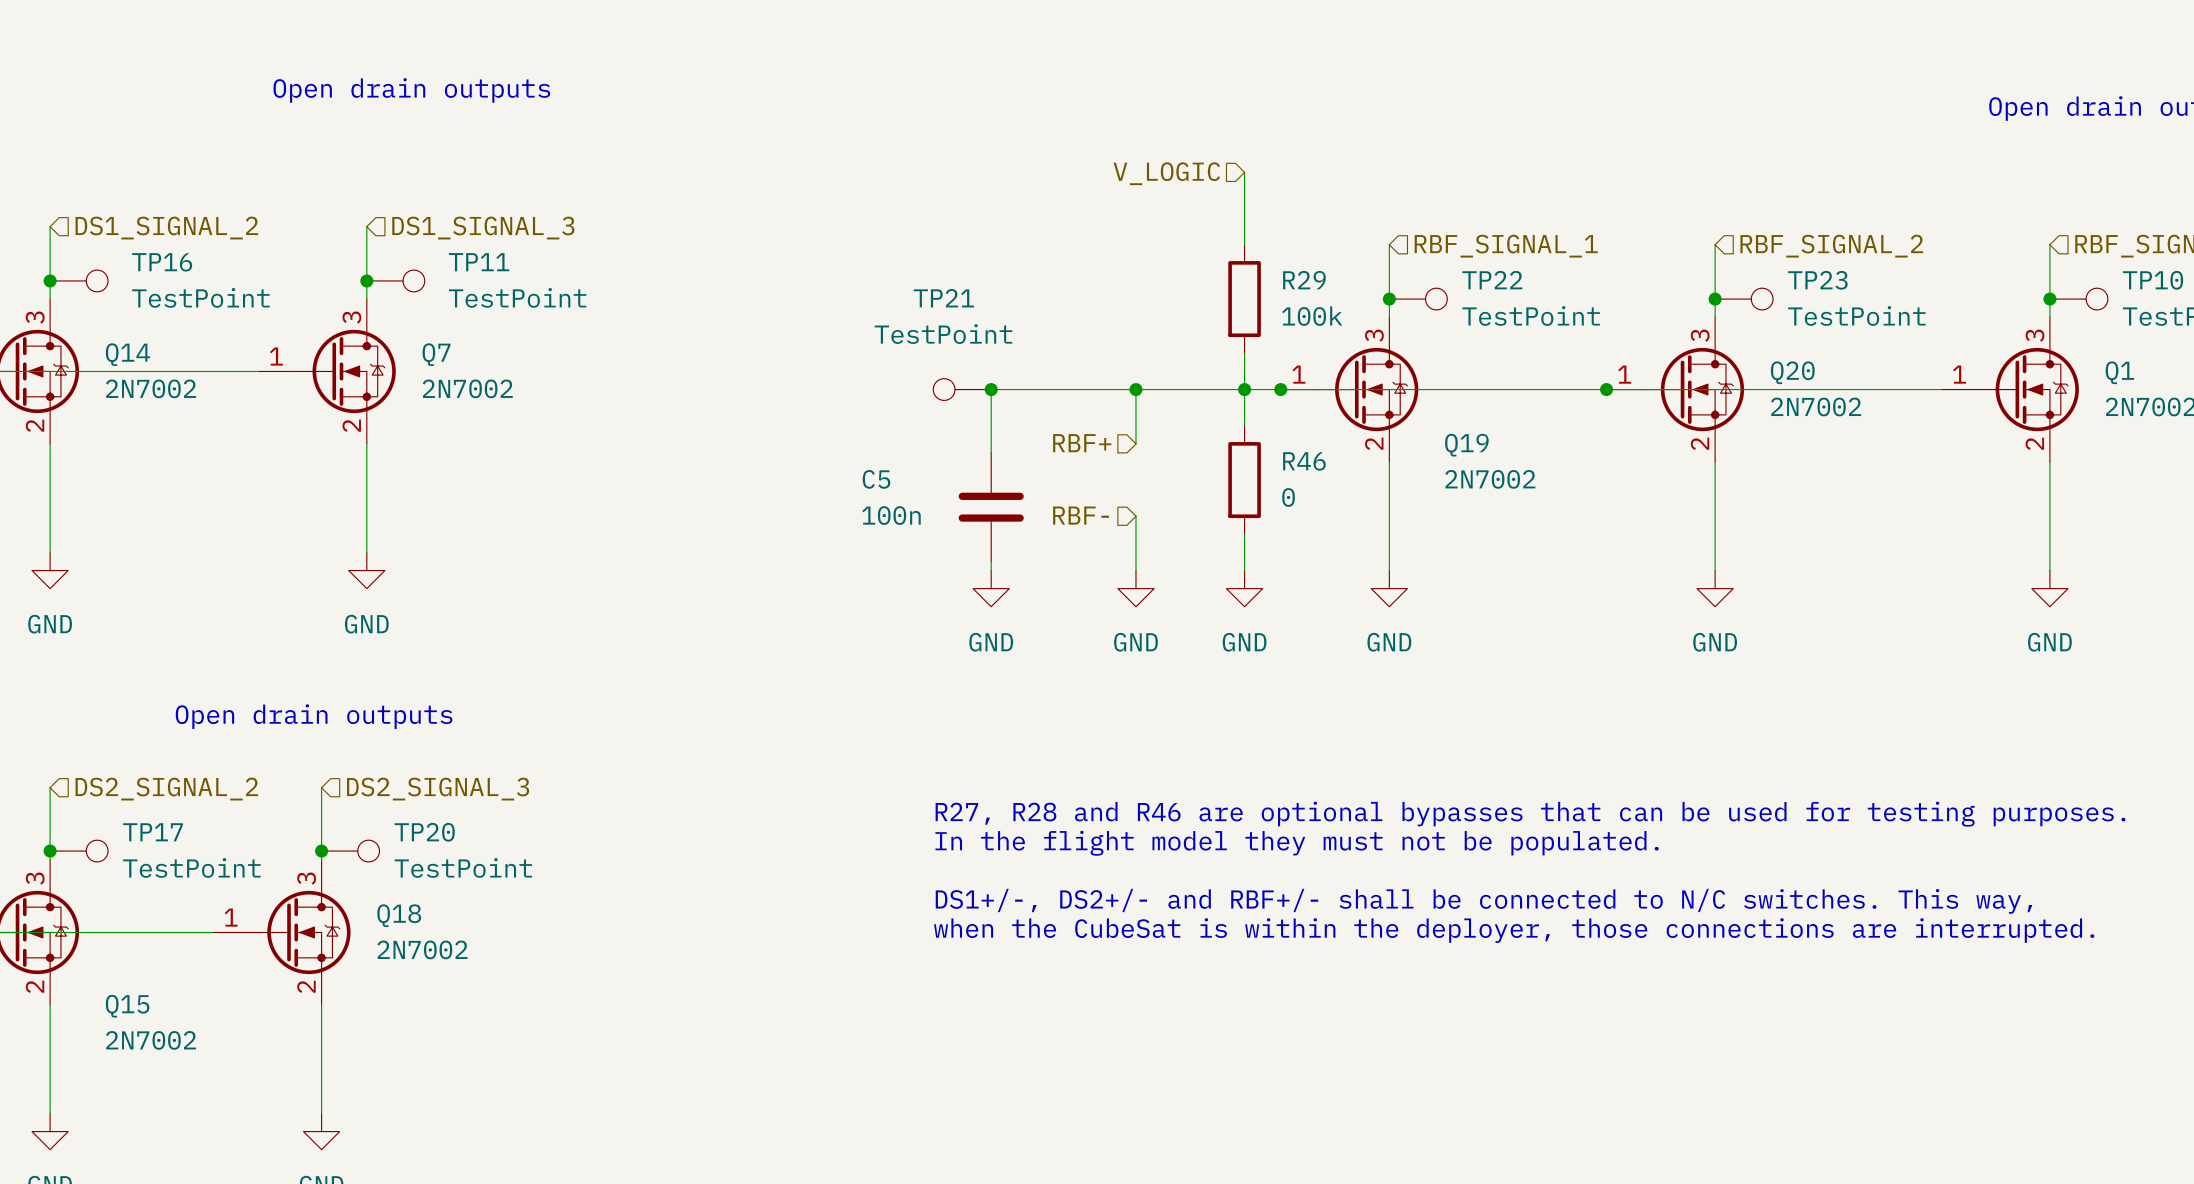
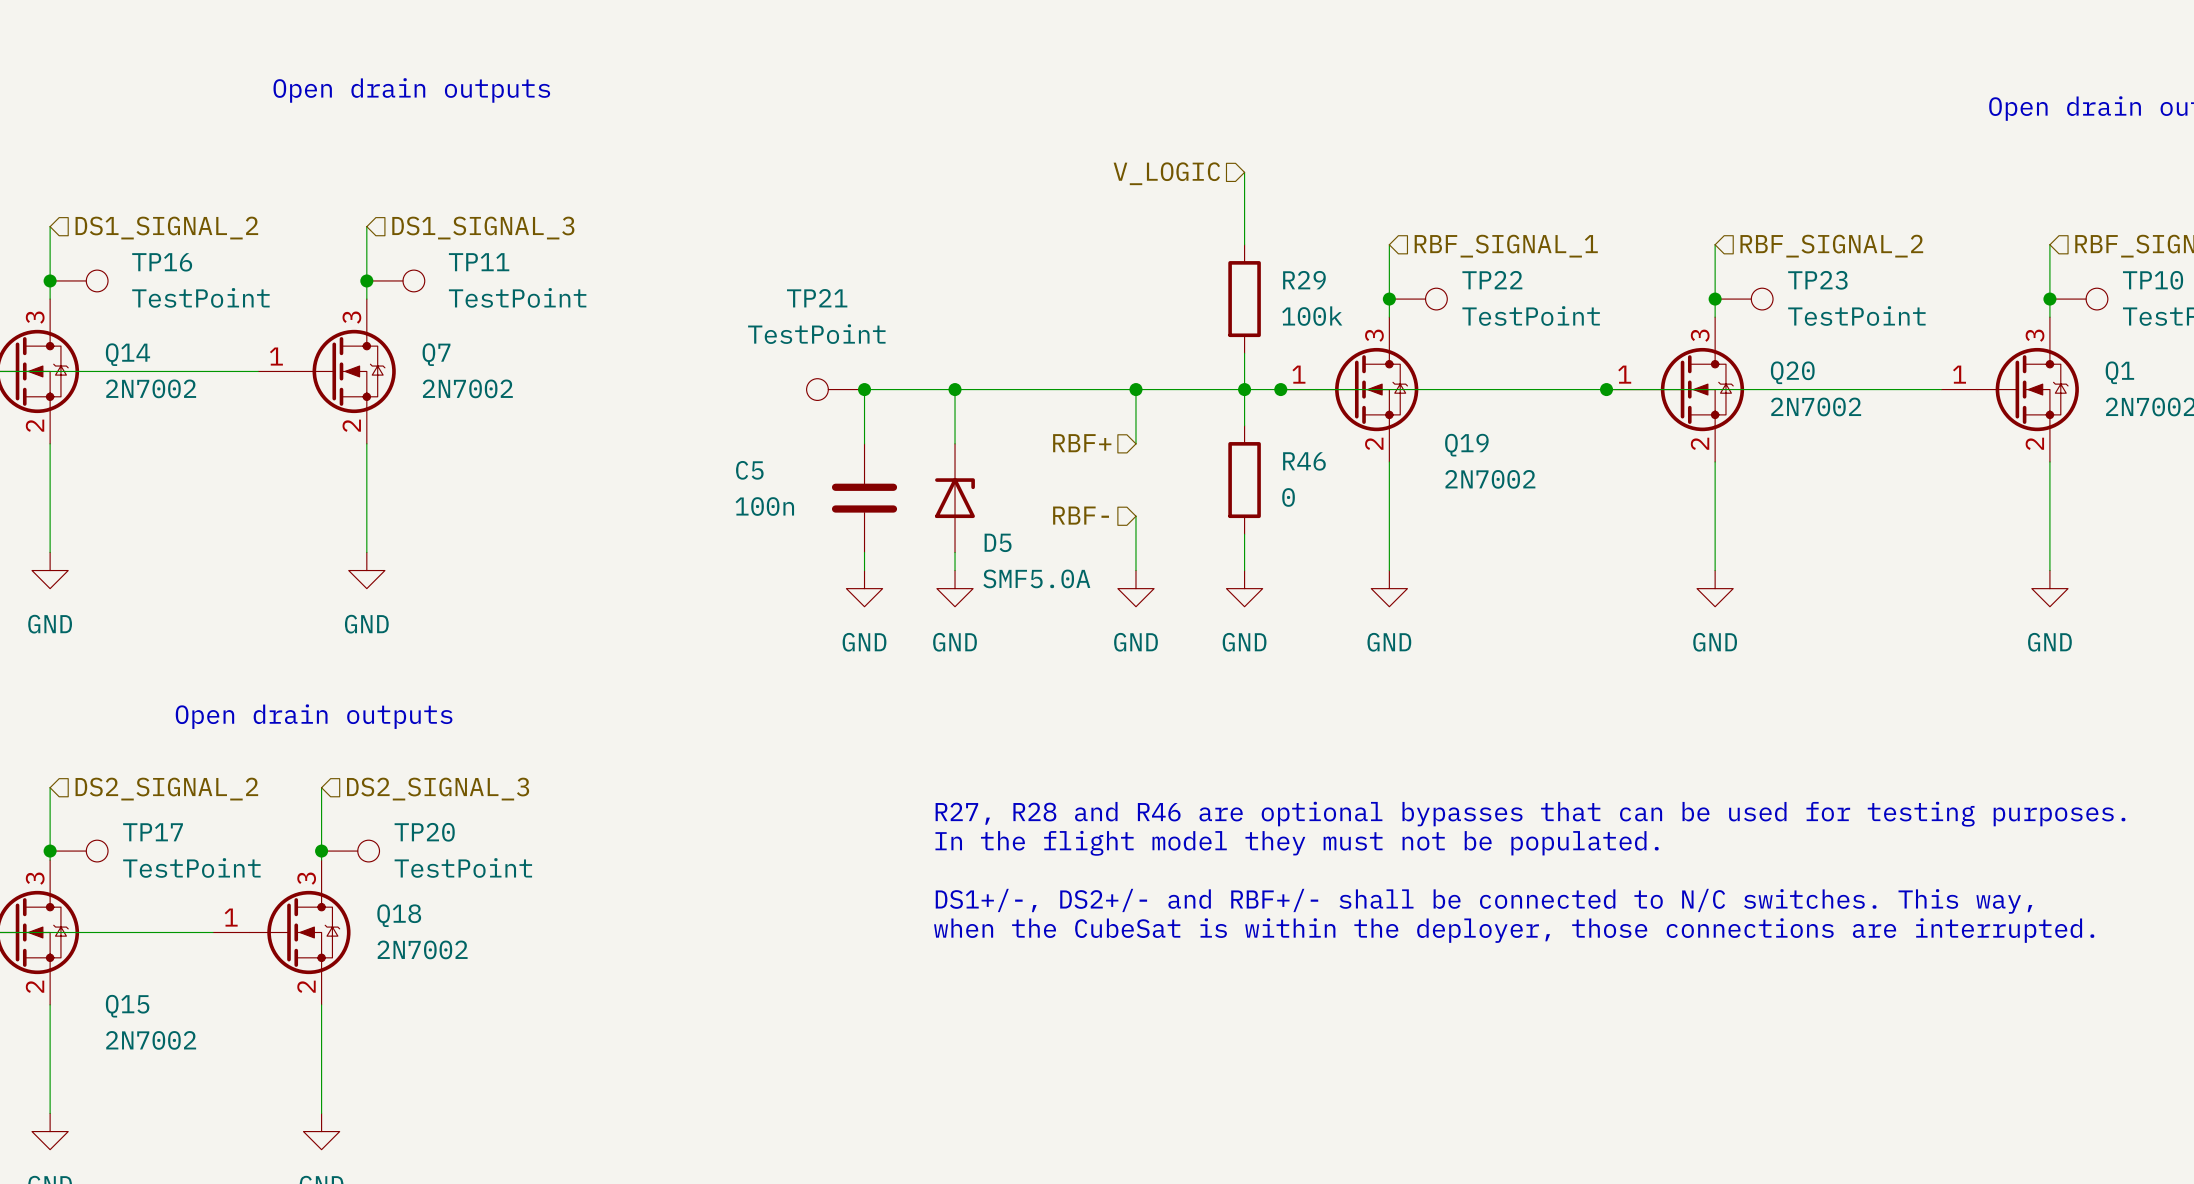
junction: none -> (864, 389)
wire: none -> (955, 389) (955, 443)
TP21 position: (962, 389) -> (835, 389)
wire: (991, 389) (991, 452) -> (991, 389) (864, 389) (864, 443)
junction position: (991, 389) -> (955, 389)
D5: none -> SMF5.0A (955, 498)
C5 position: (991, 507) -> (864, 498)
wire: none -> (864, 552) (864, 570)
wire: none -> (955, 552) (955, 570)
wire: (991, 561) (991, 570) -> none
power symbol: none -> GND (864, 588)
power symbol position: GND (991, 588) -> GND (955, 588)

